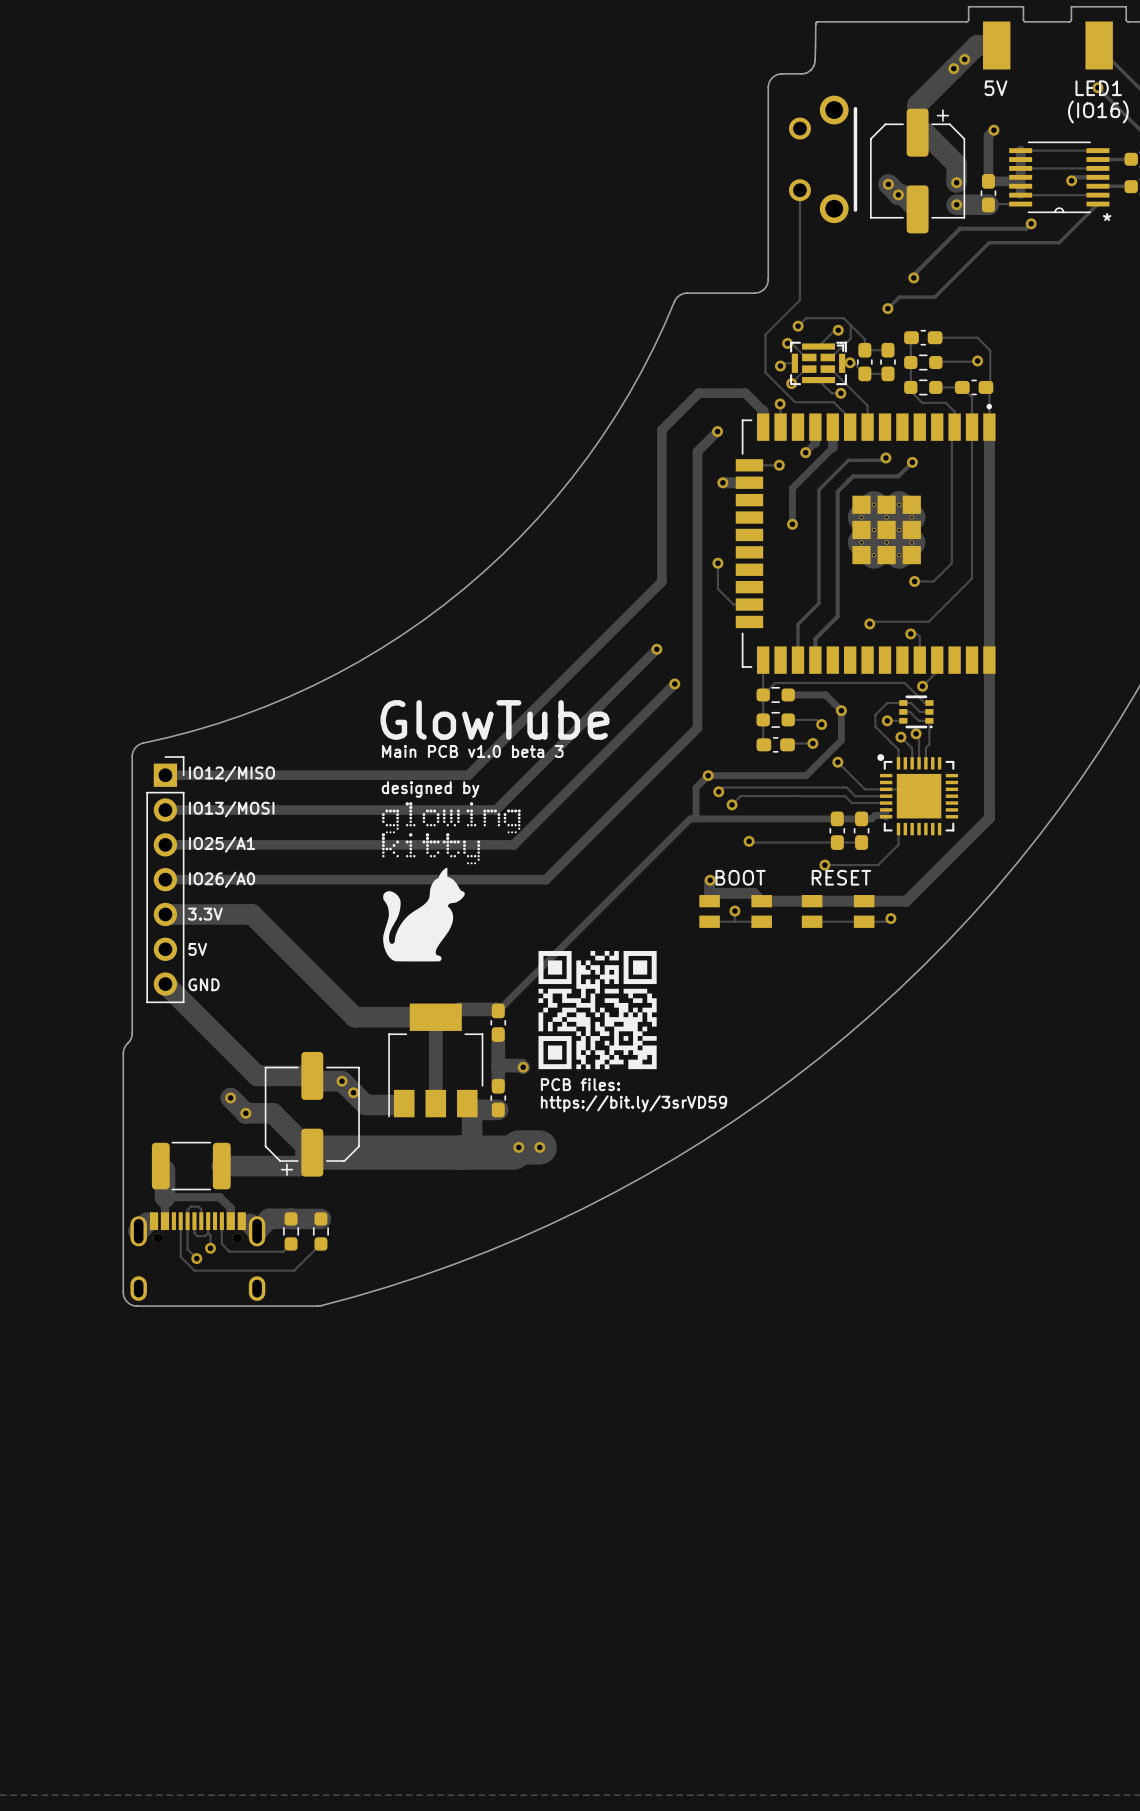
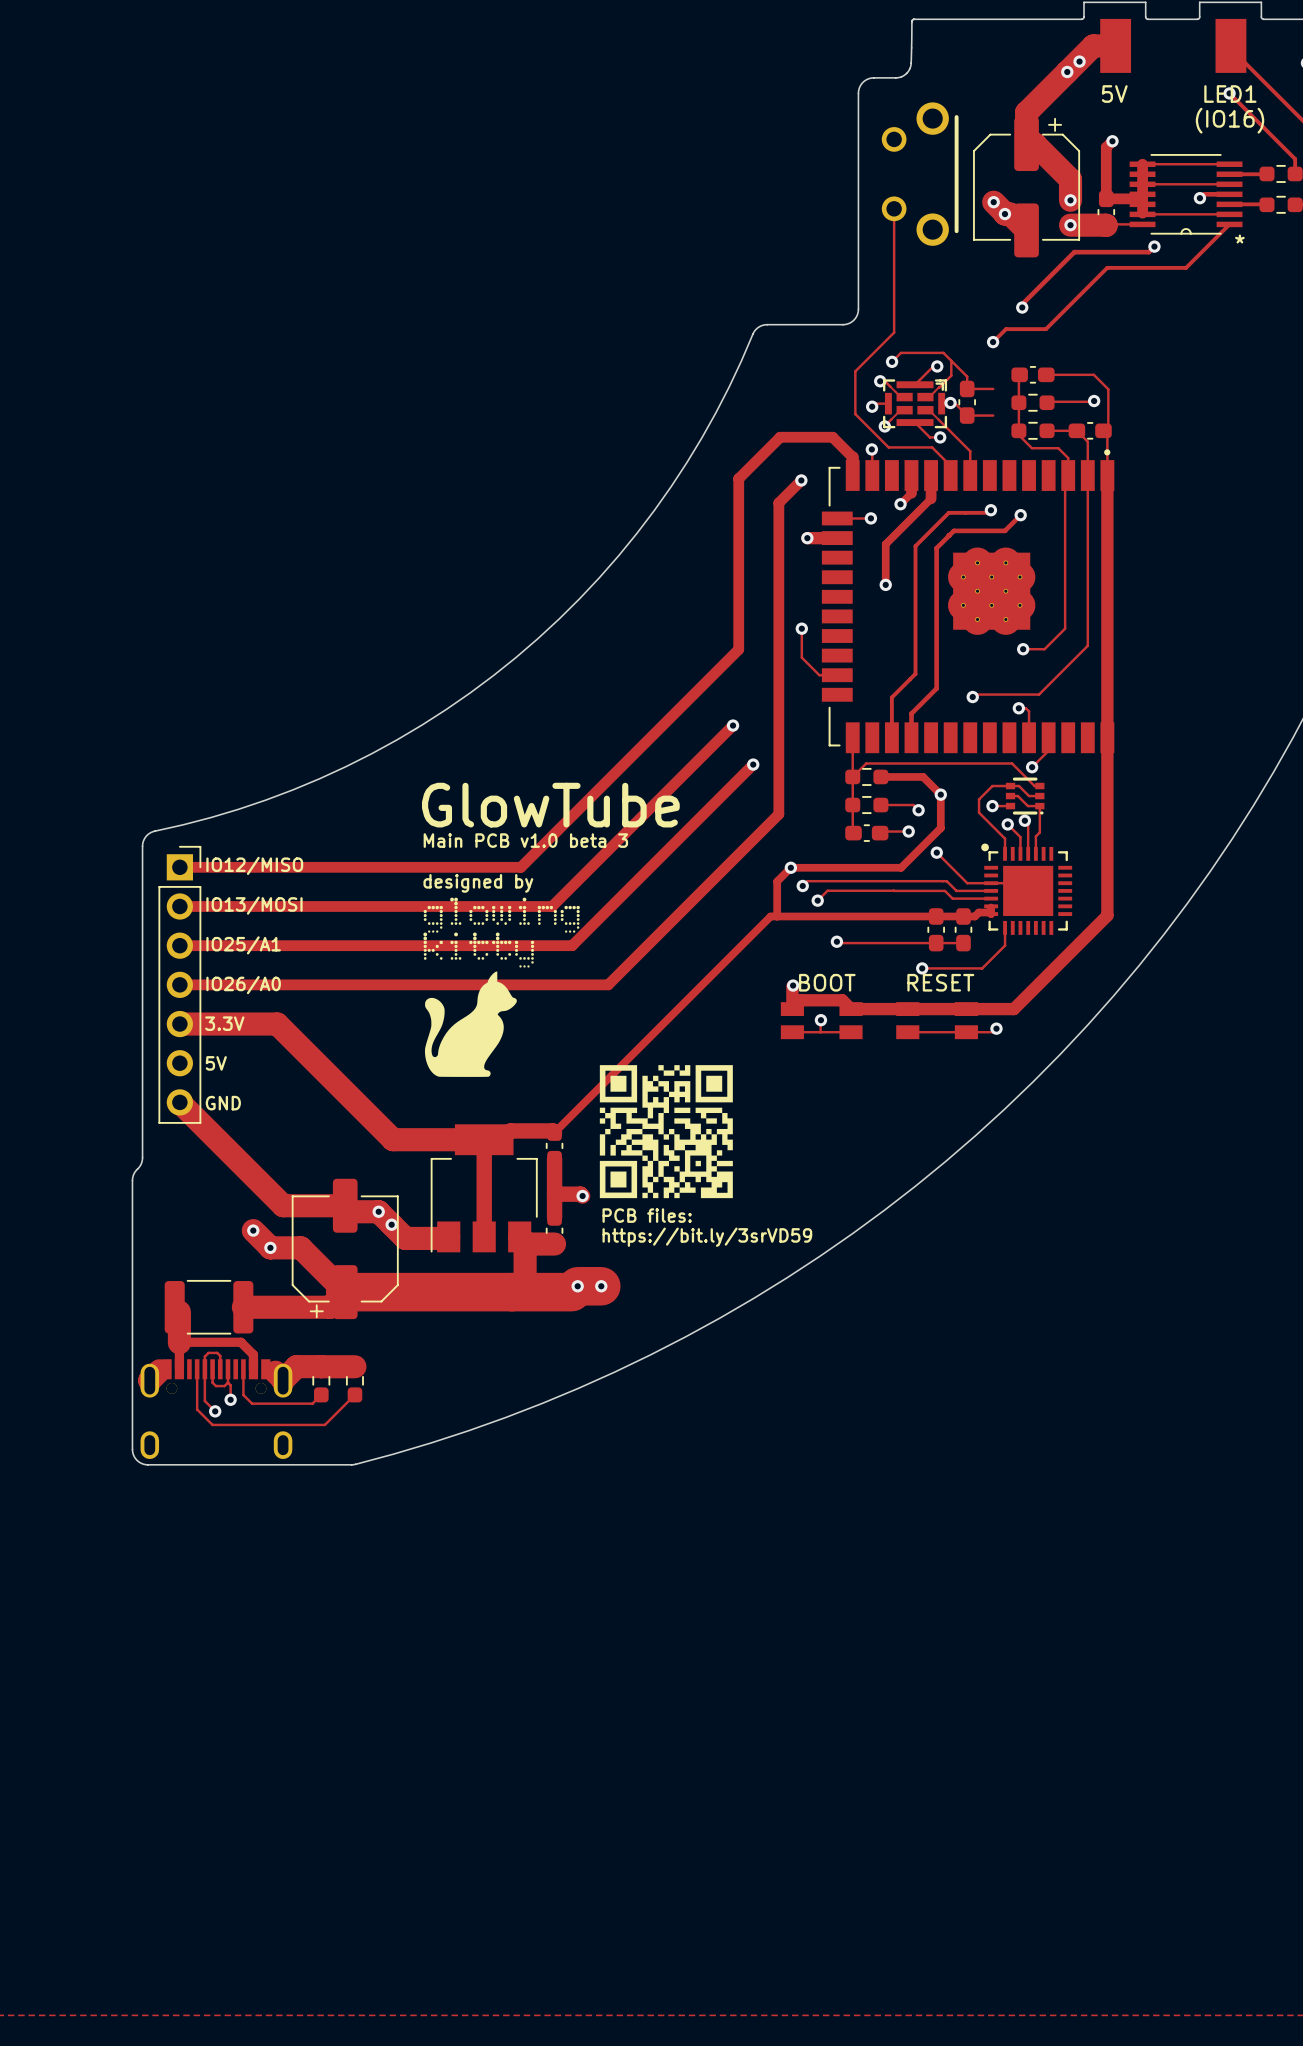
part: (888, 362) -> none

